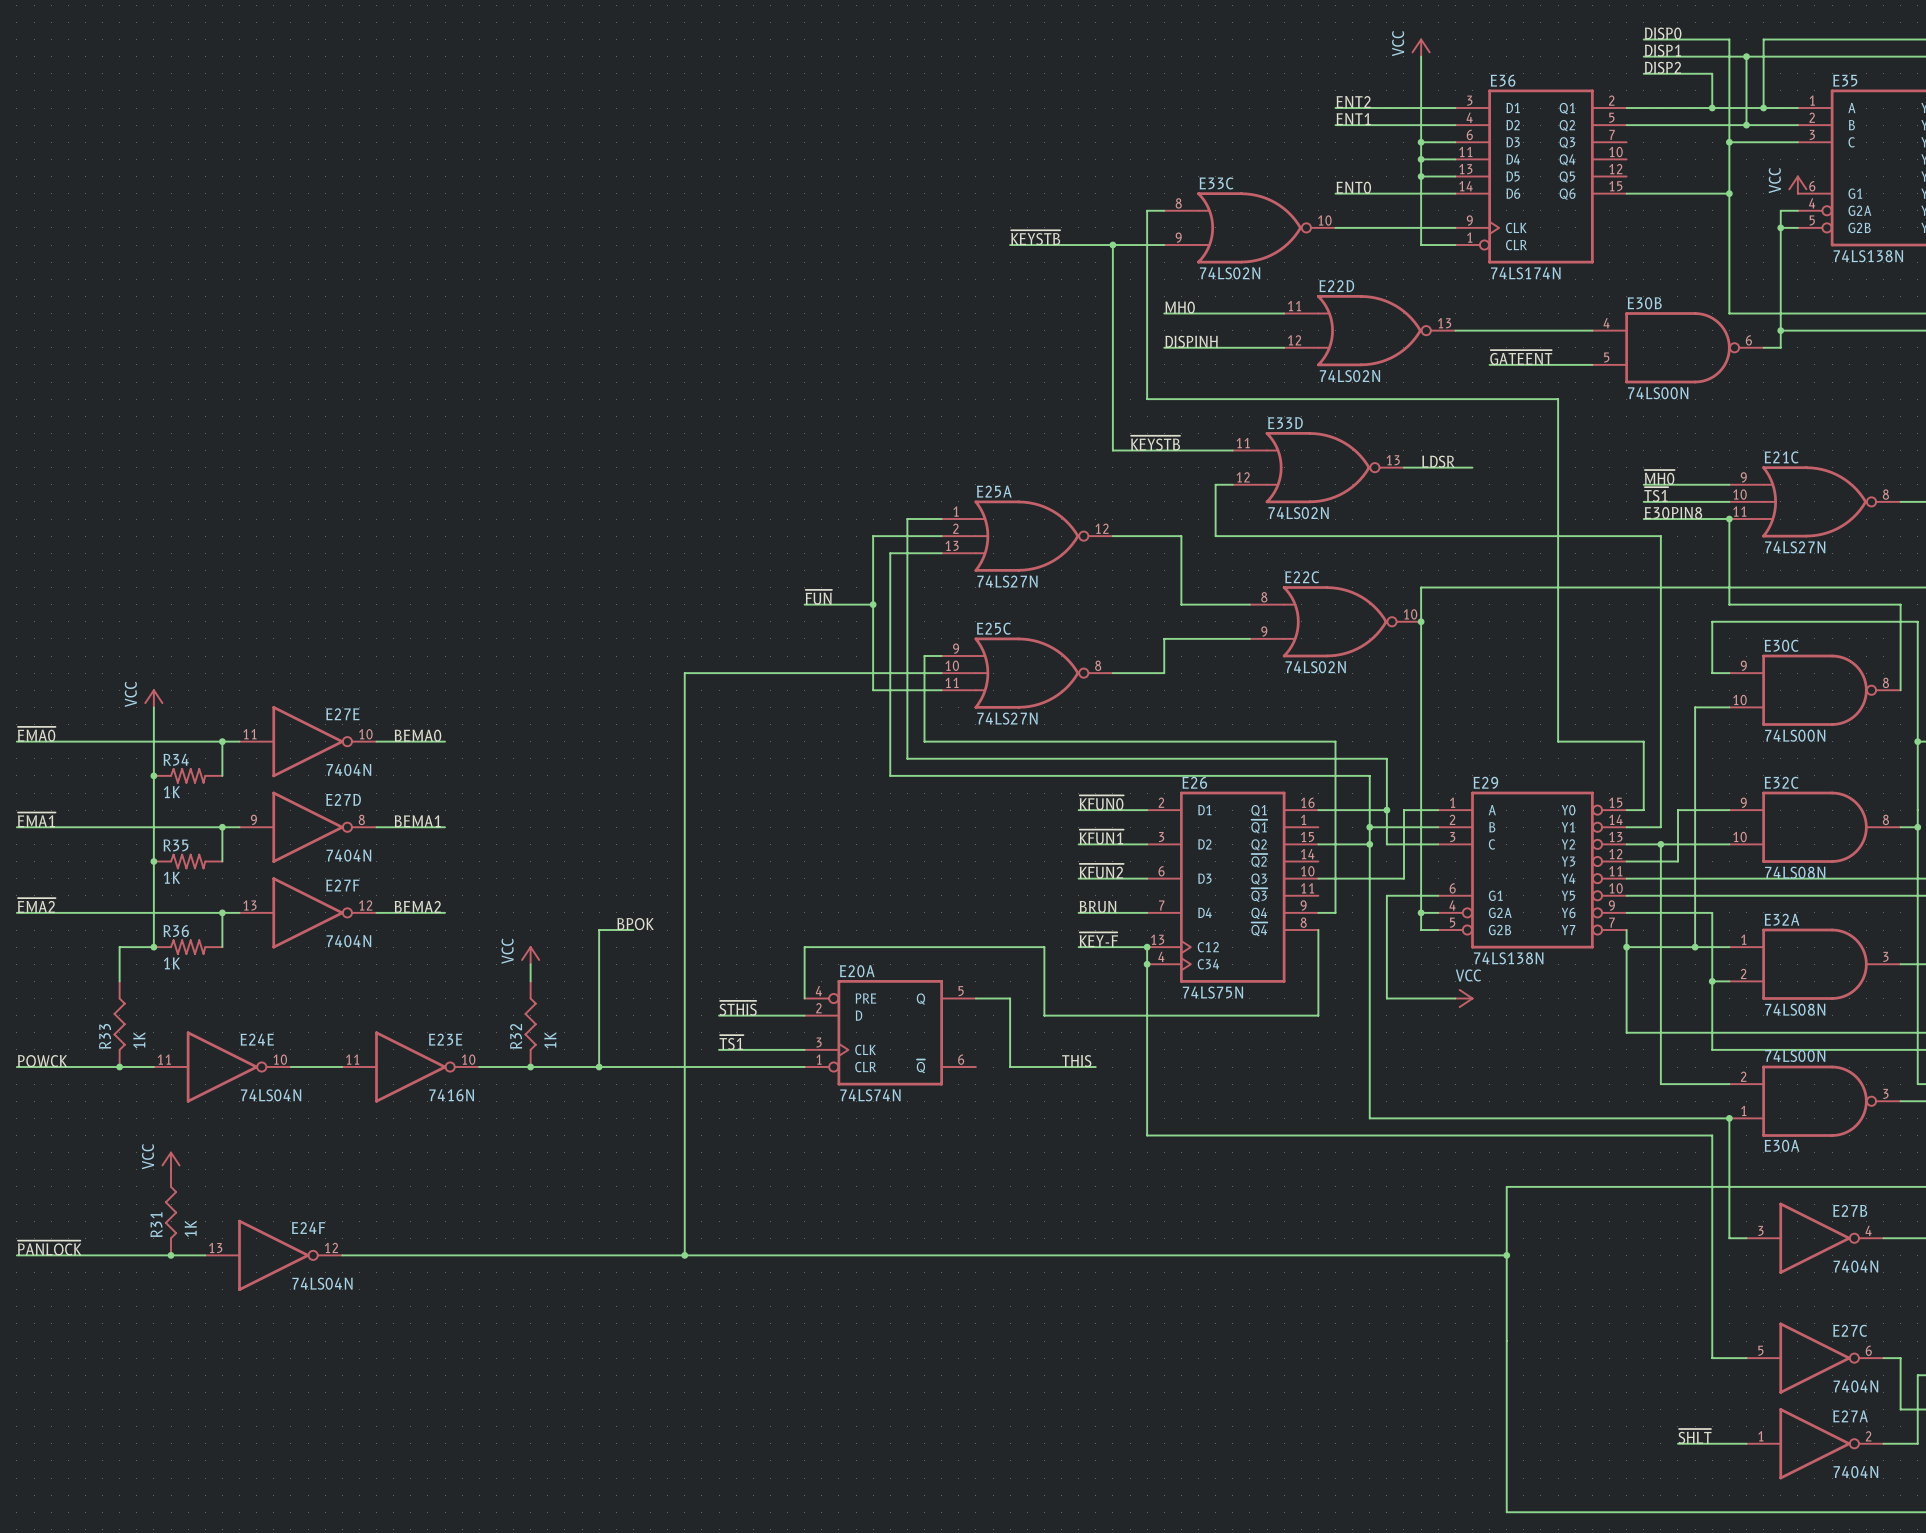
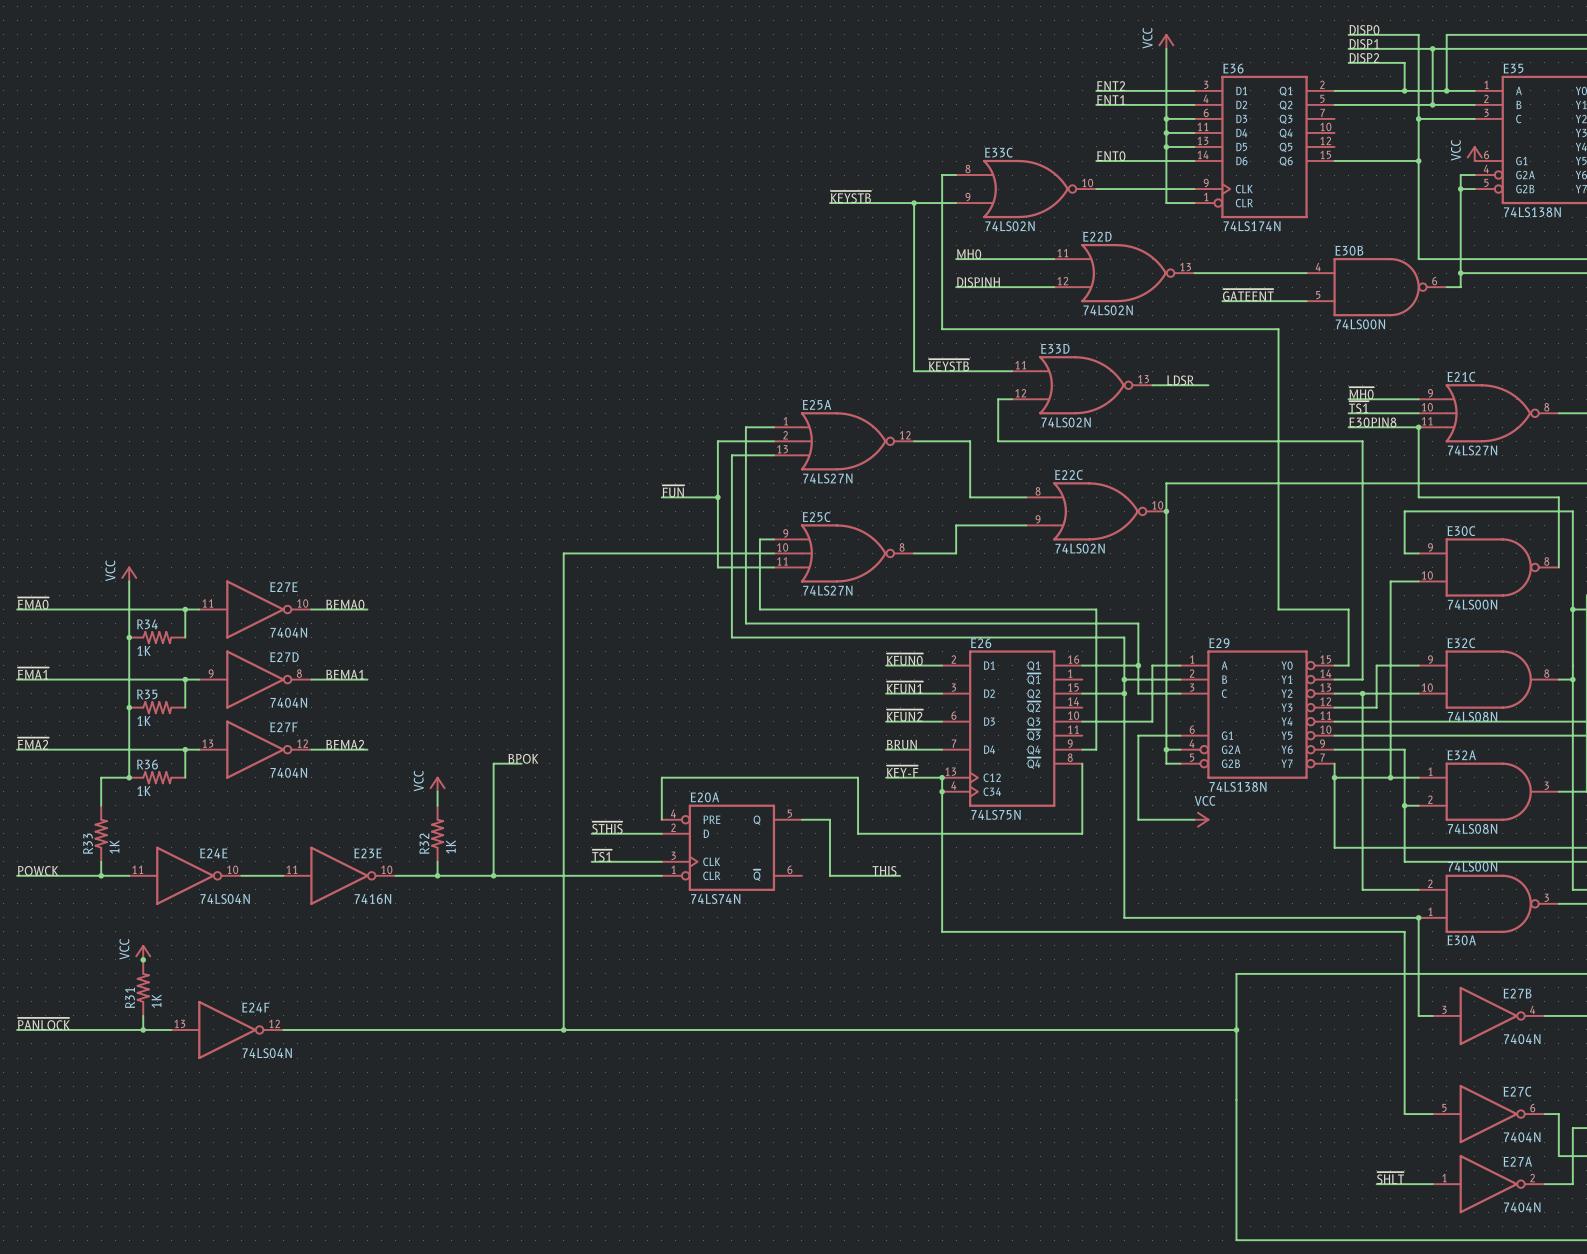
R33 symbol: [113, 981, 126, 1068] -> [95, 805, 108, 862]
R32 symbol: [524, 981, 537, 1068] -> [431, 805, 444, 862]
R31 symbol: [165, 1169, 178, 1256] -> [137, 959, 150, 1016]
junction: none -> (143, 959)

